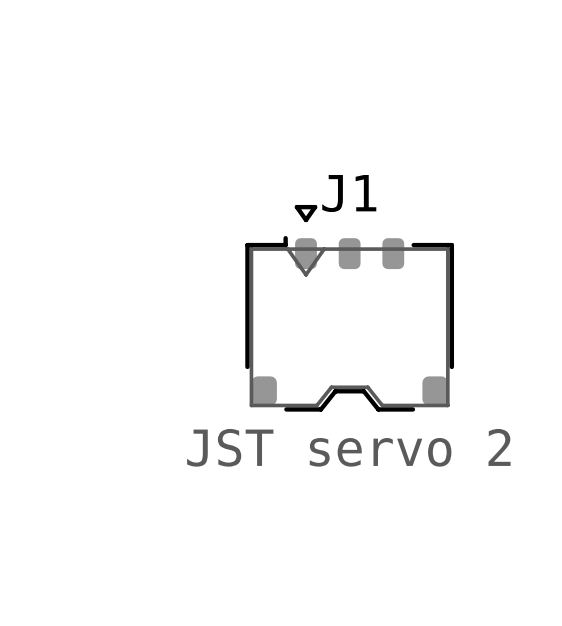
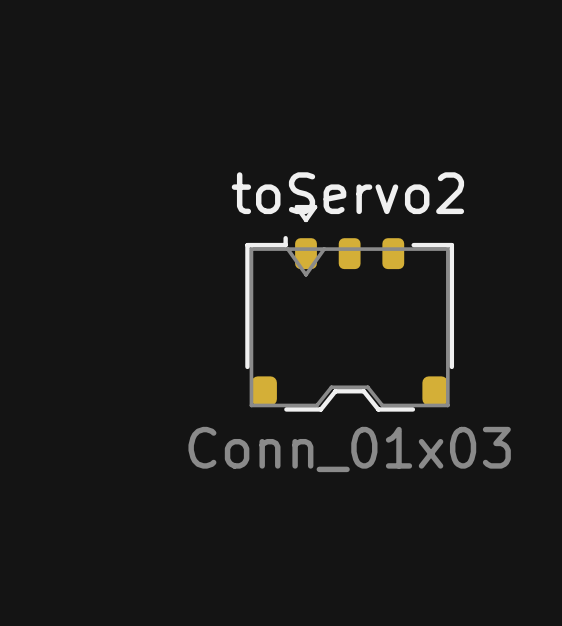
J1 name: J1 (349, 193) -> toServo2 (347, 193)
J1 value: JST servo 2 (348, 447) -> Conn_01x03 (349, 449)

